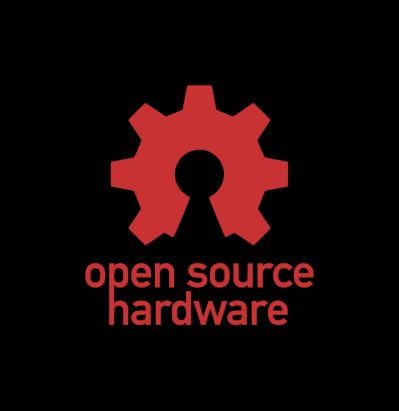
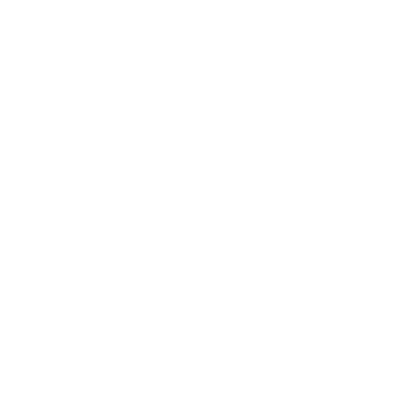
drawing: [85, 85, 314, 326] -> none

